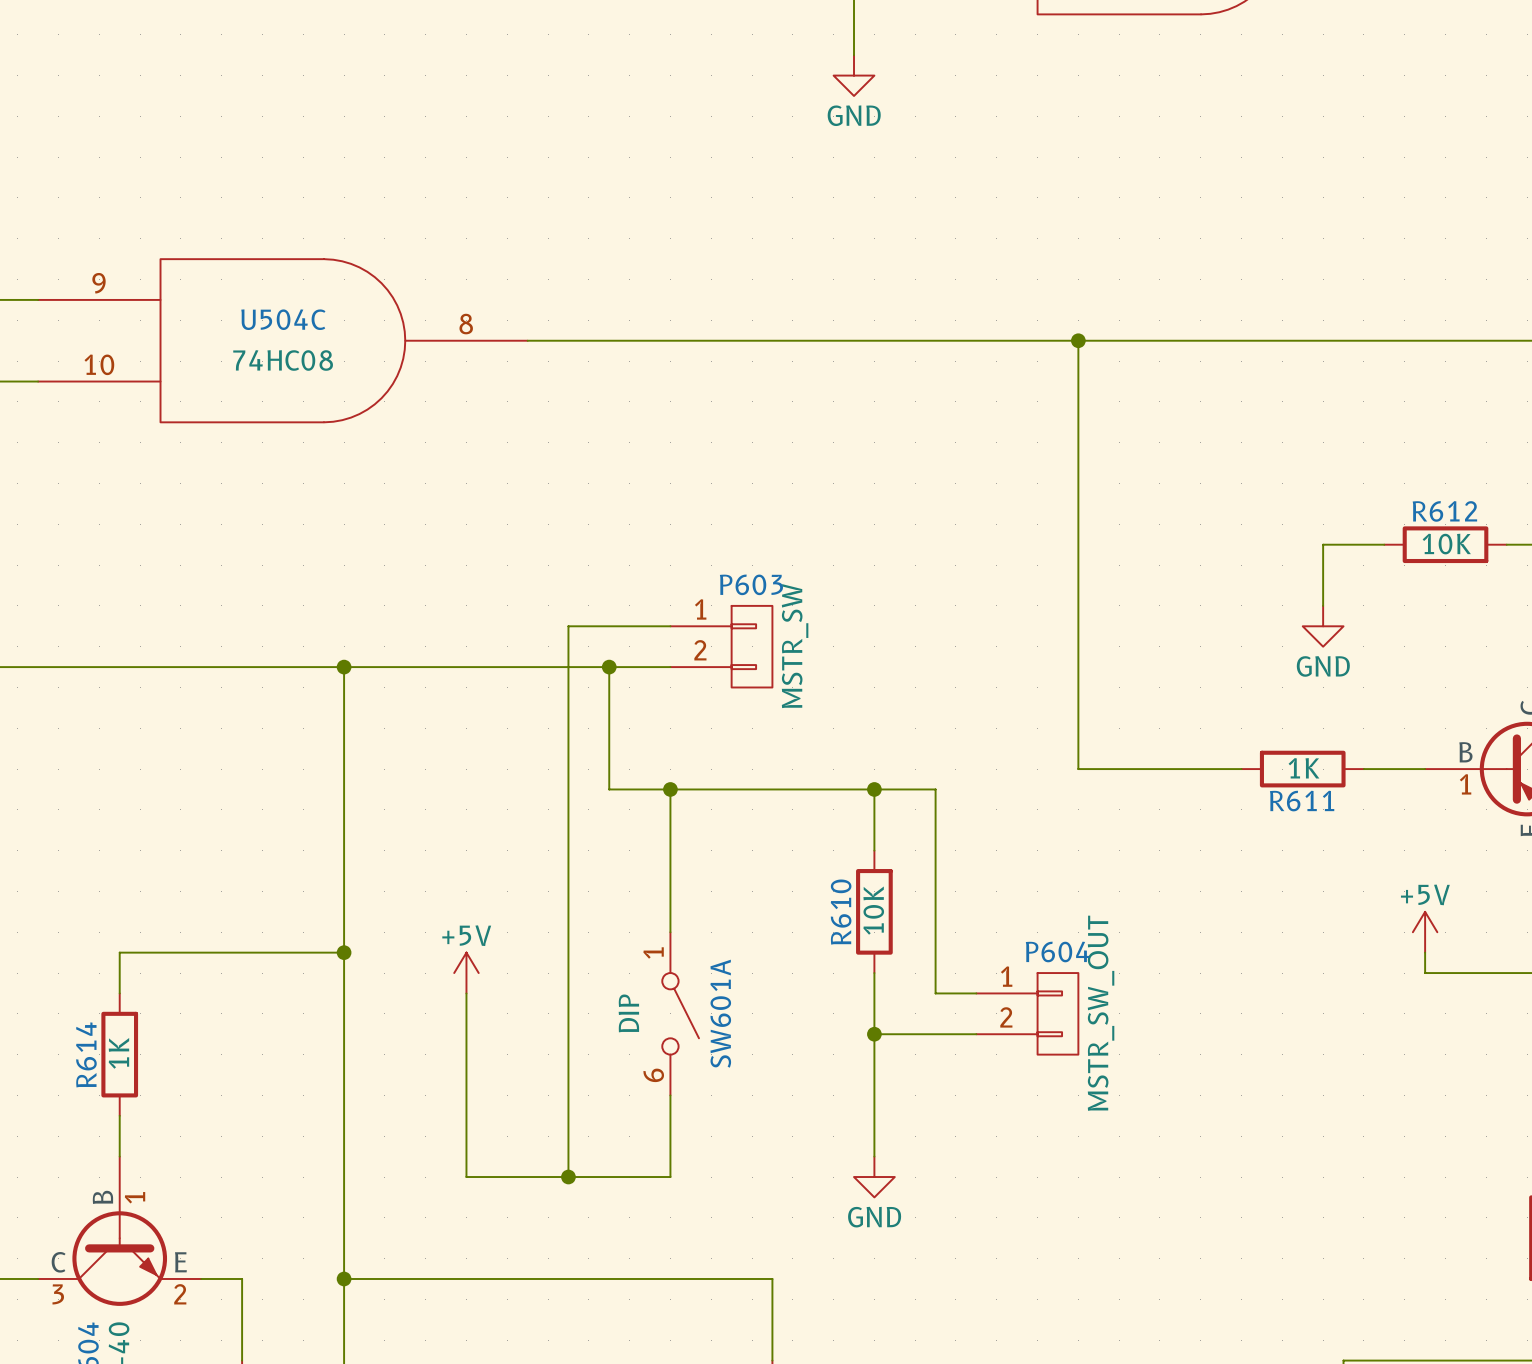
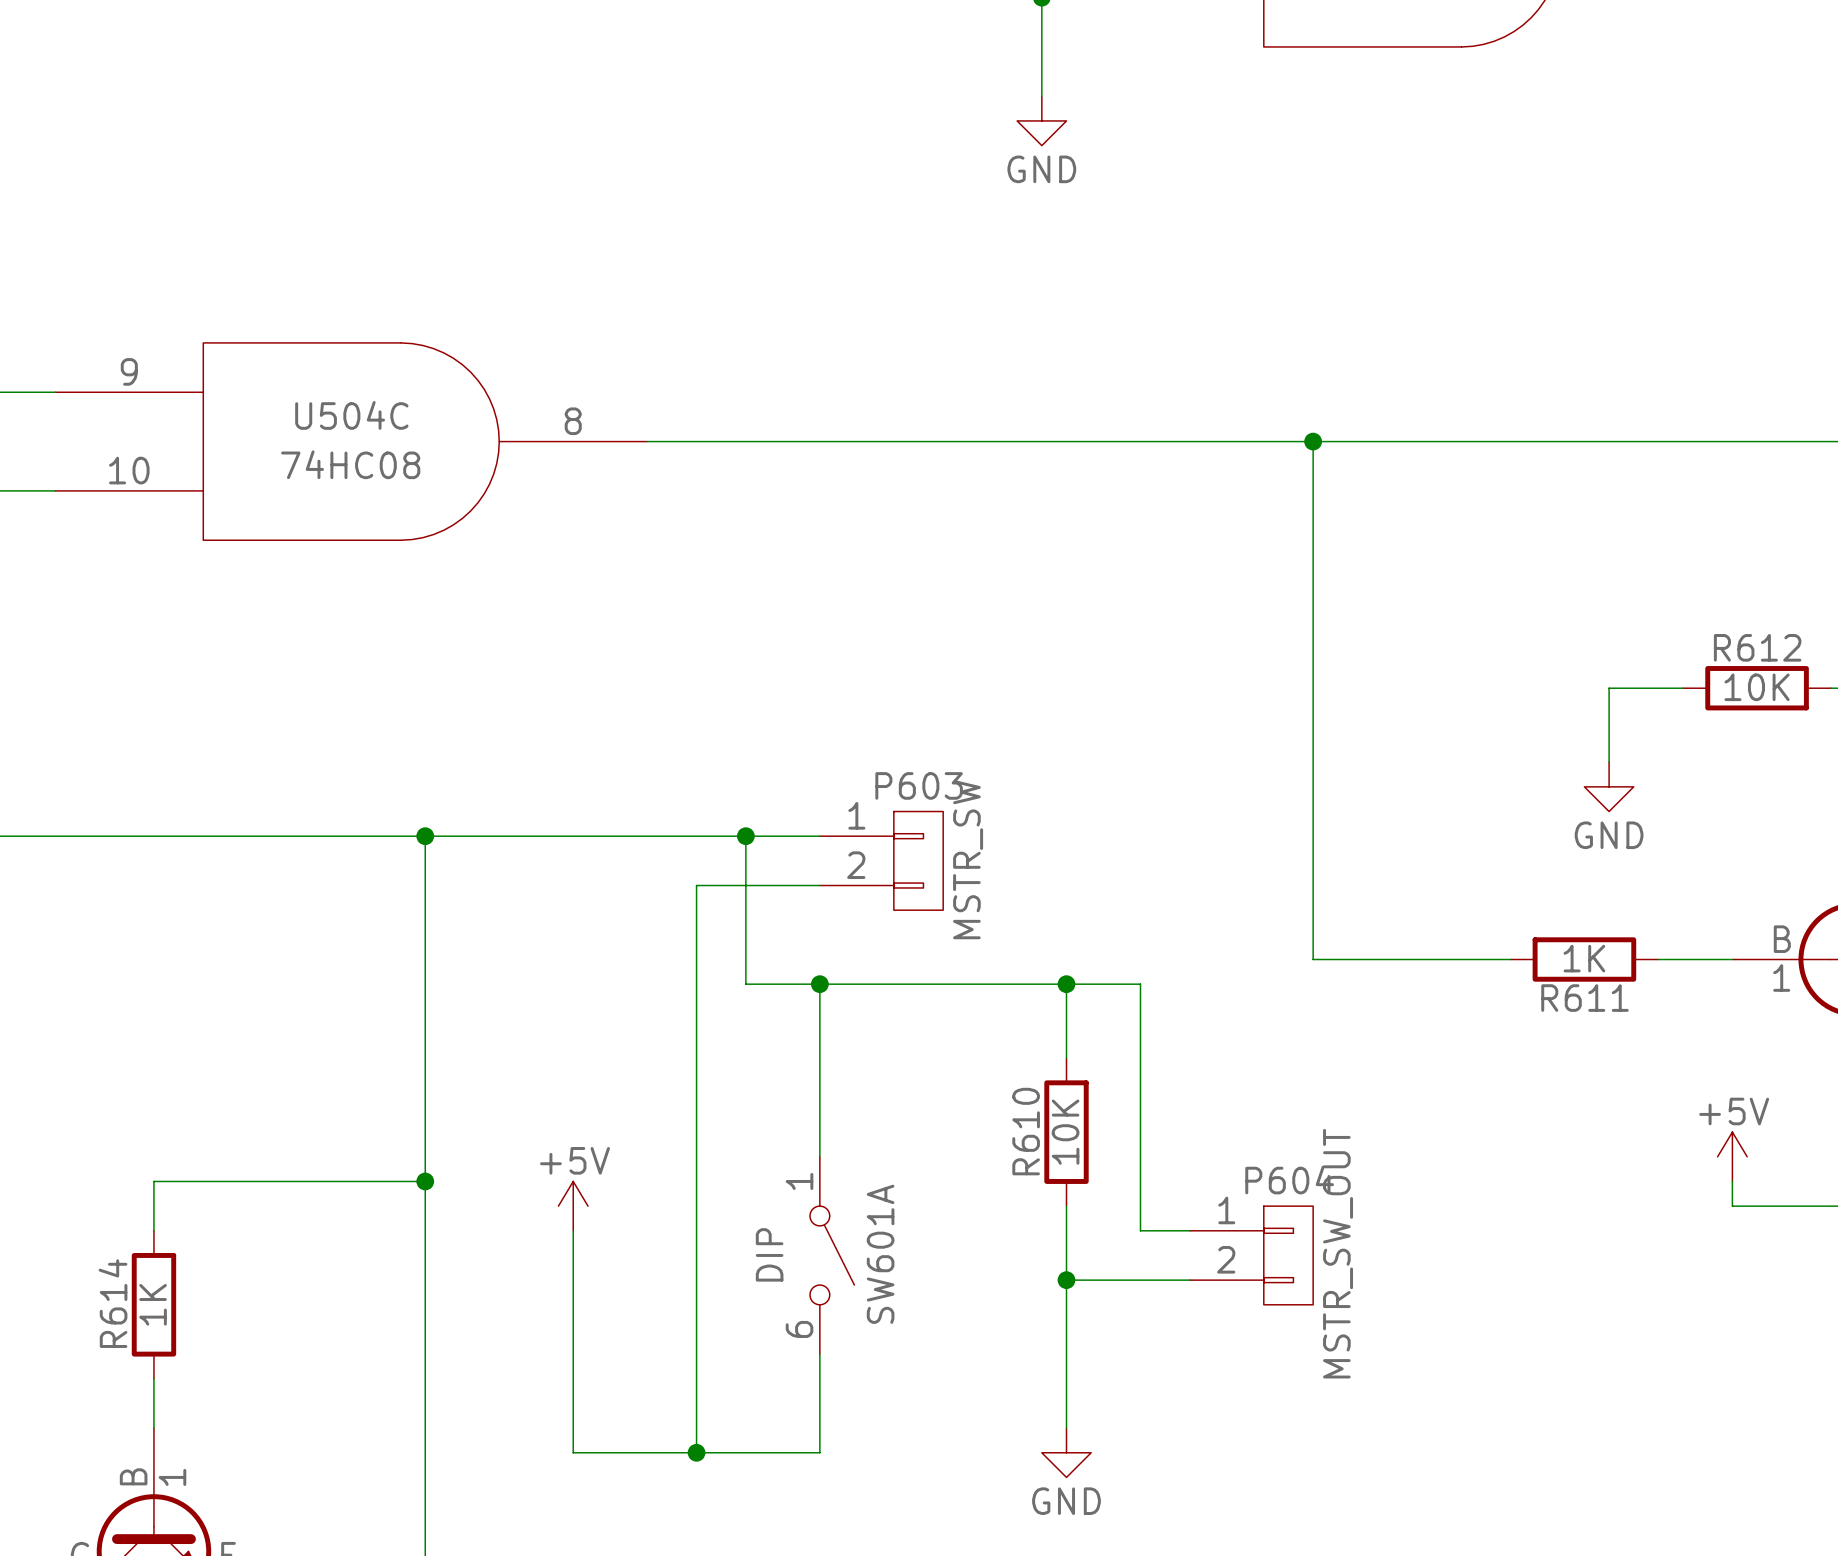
wire: (670, 626) (568, 626) (568, 707) -> (819, 885) (696, 885)
P603 position: (721, 646) -> (881, 860)

